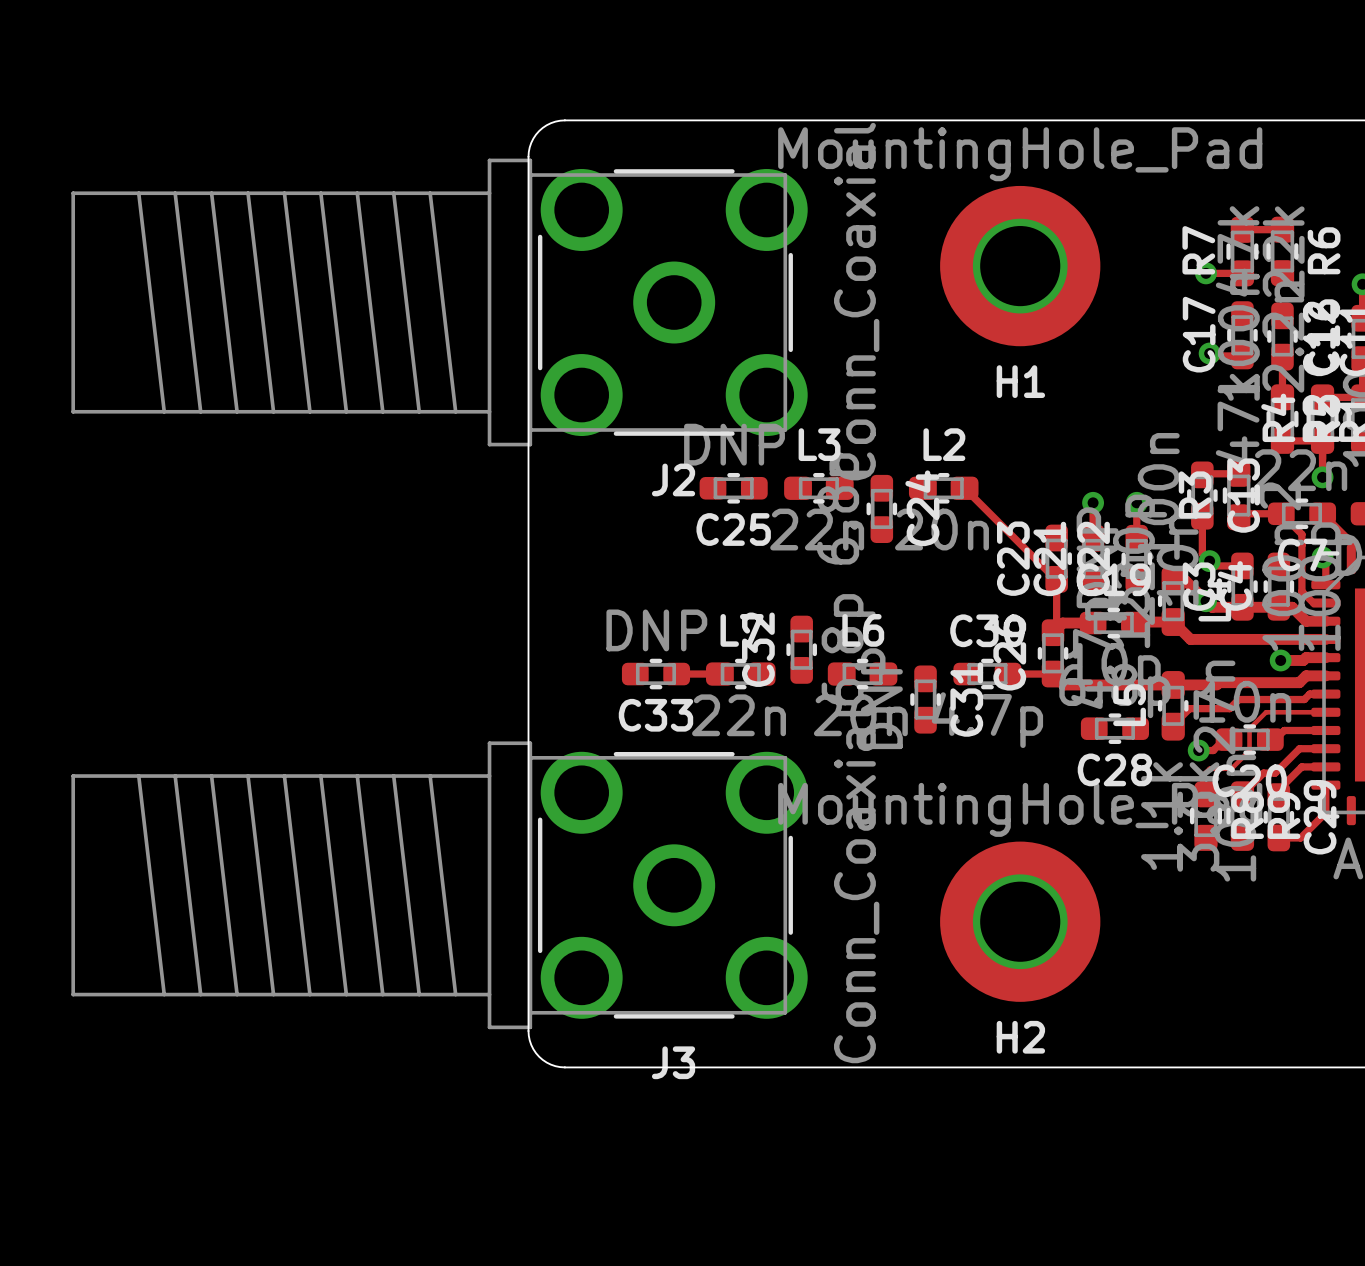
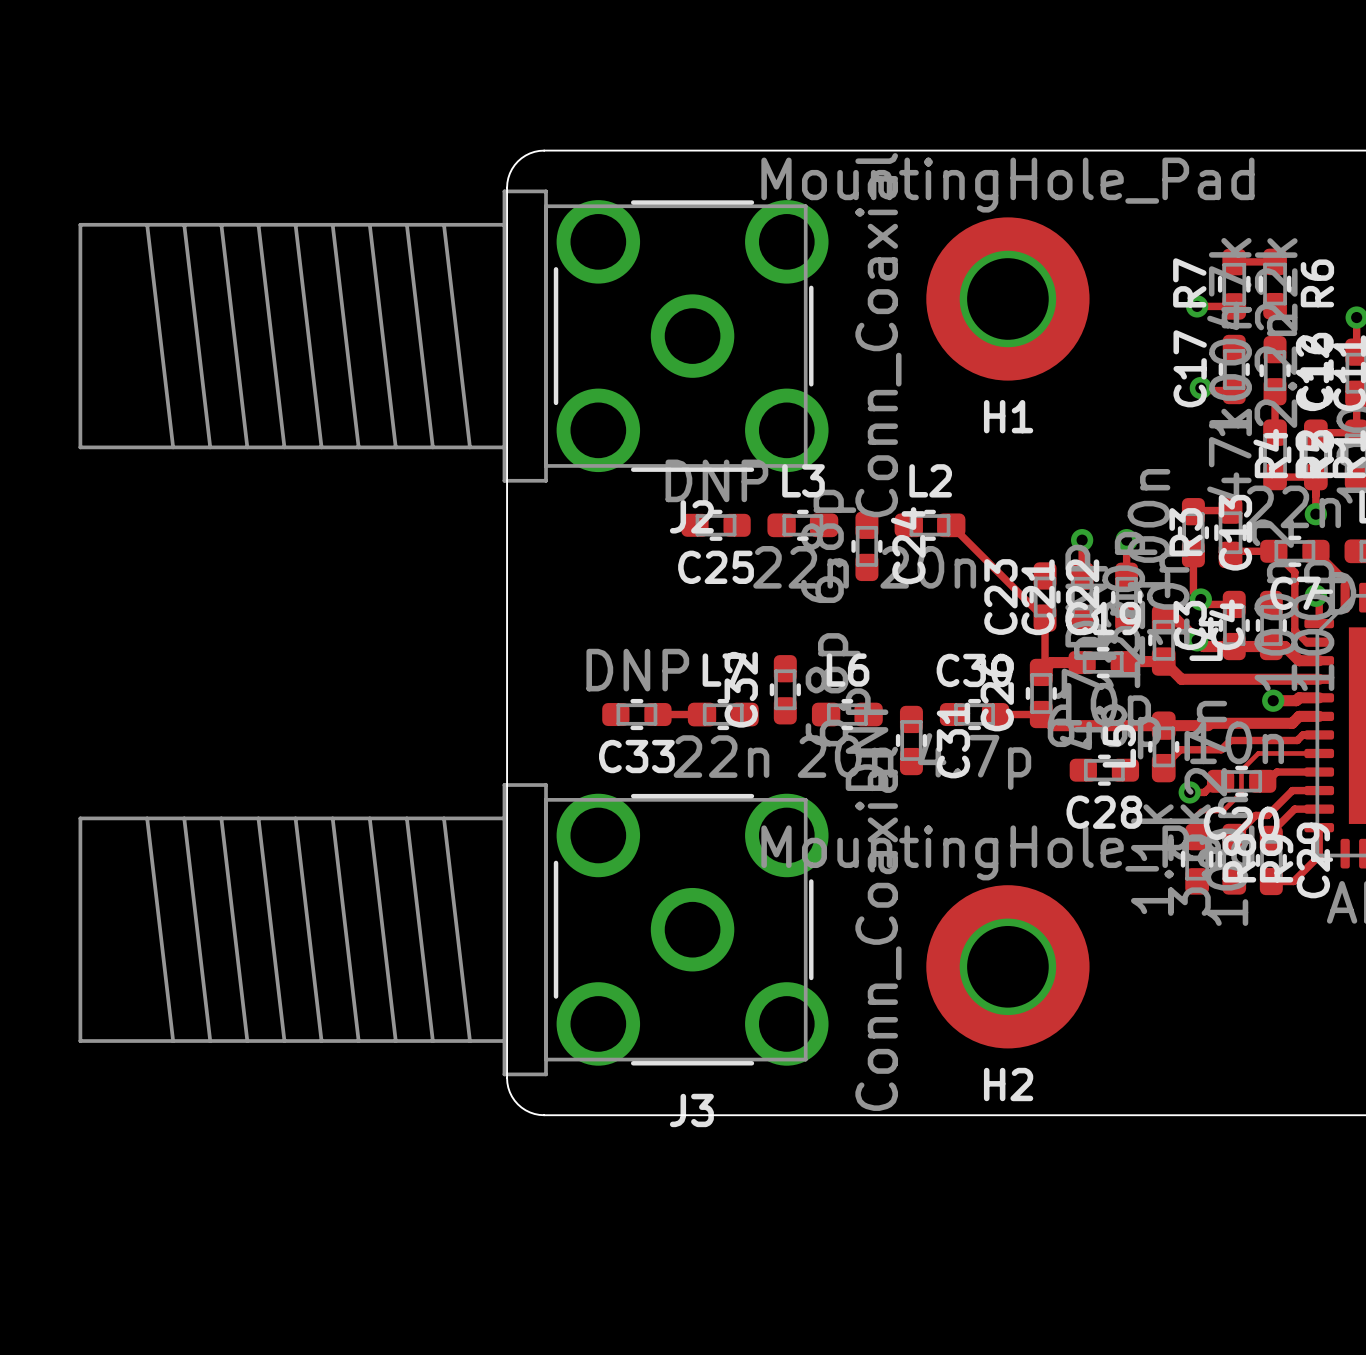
J2 position: (439, 302) -> (453, 336)
J3 position: (439, 885) -> (453, 929)

